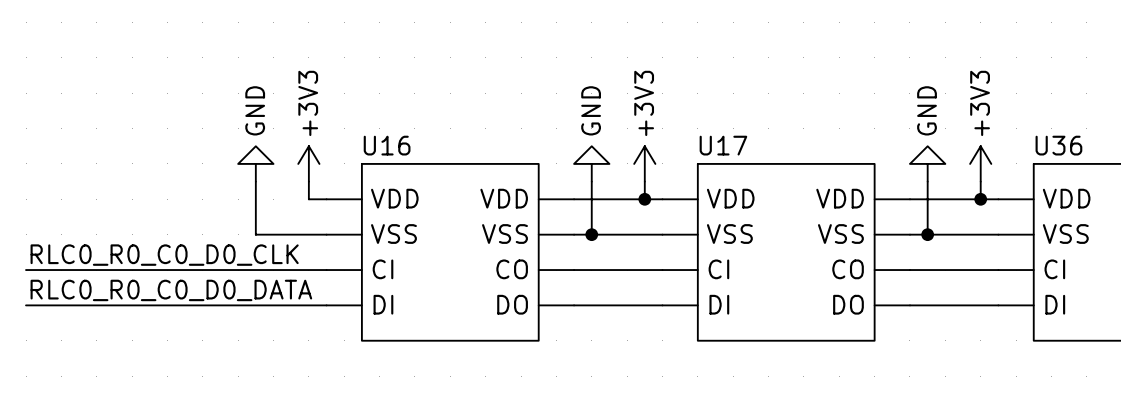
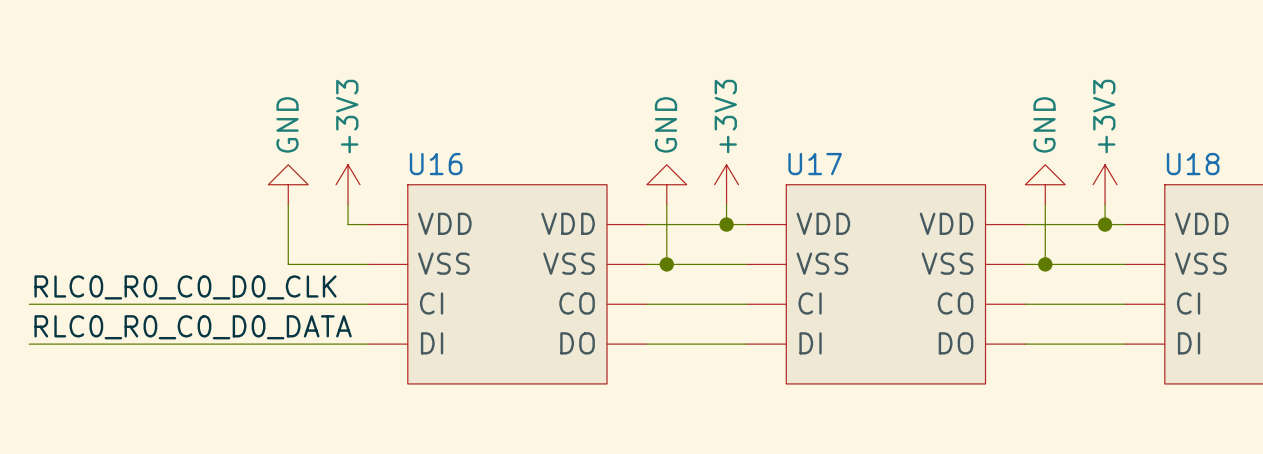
U36 name: U36 (1058, 145) -> U18 (1193, 164)

